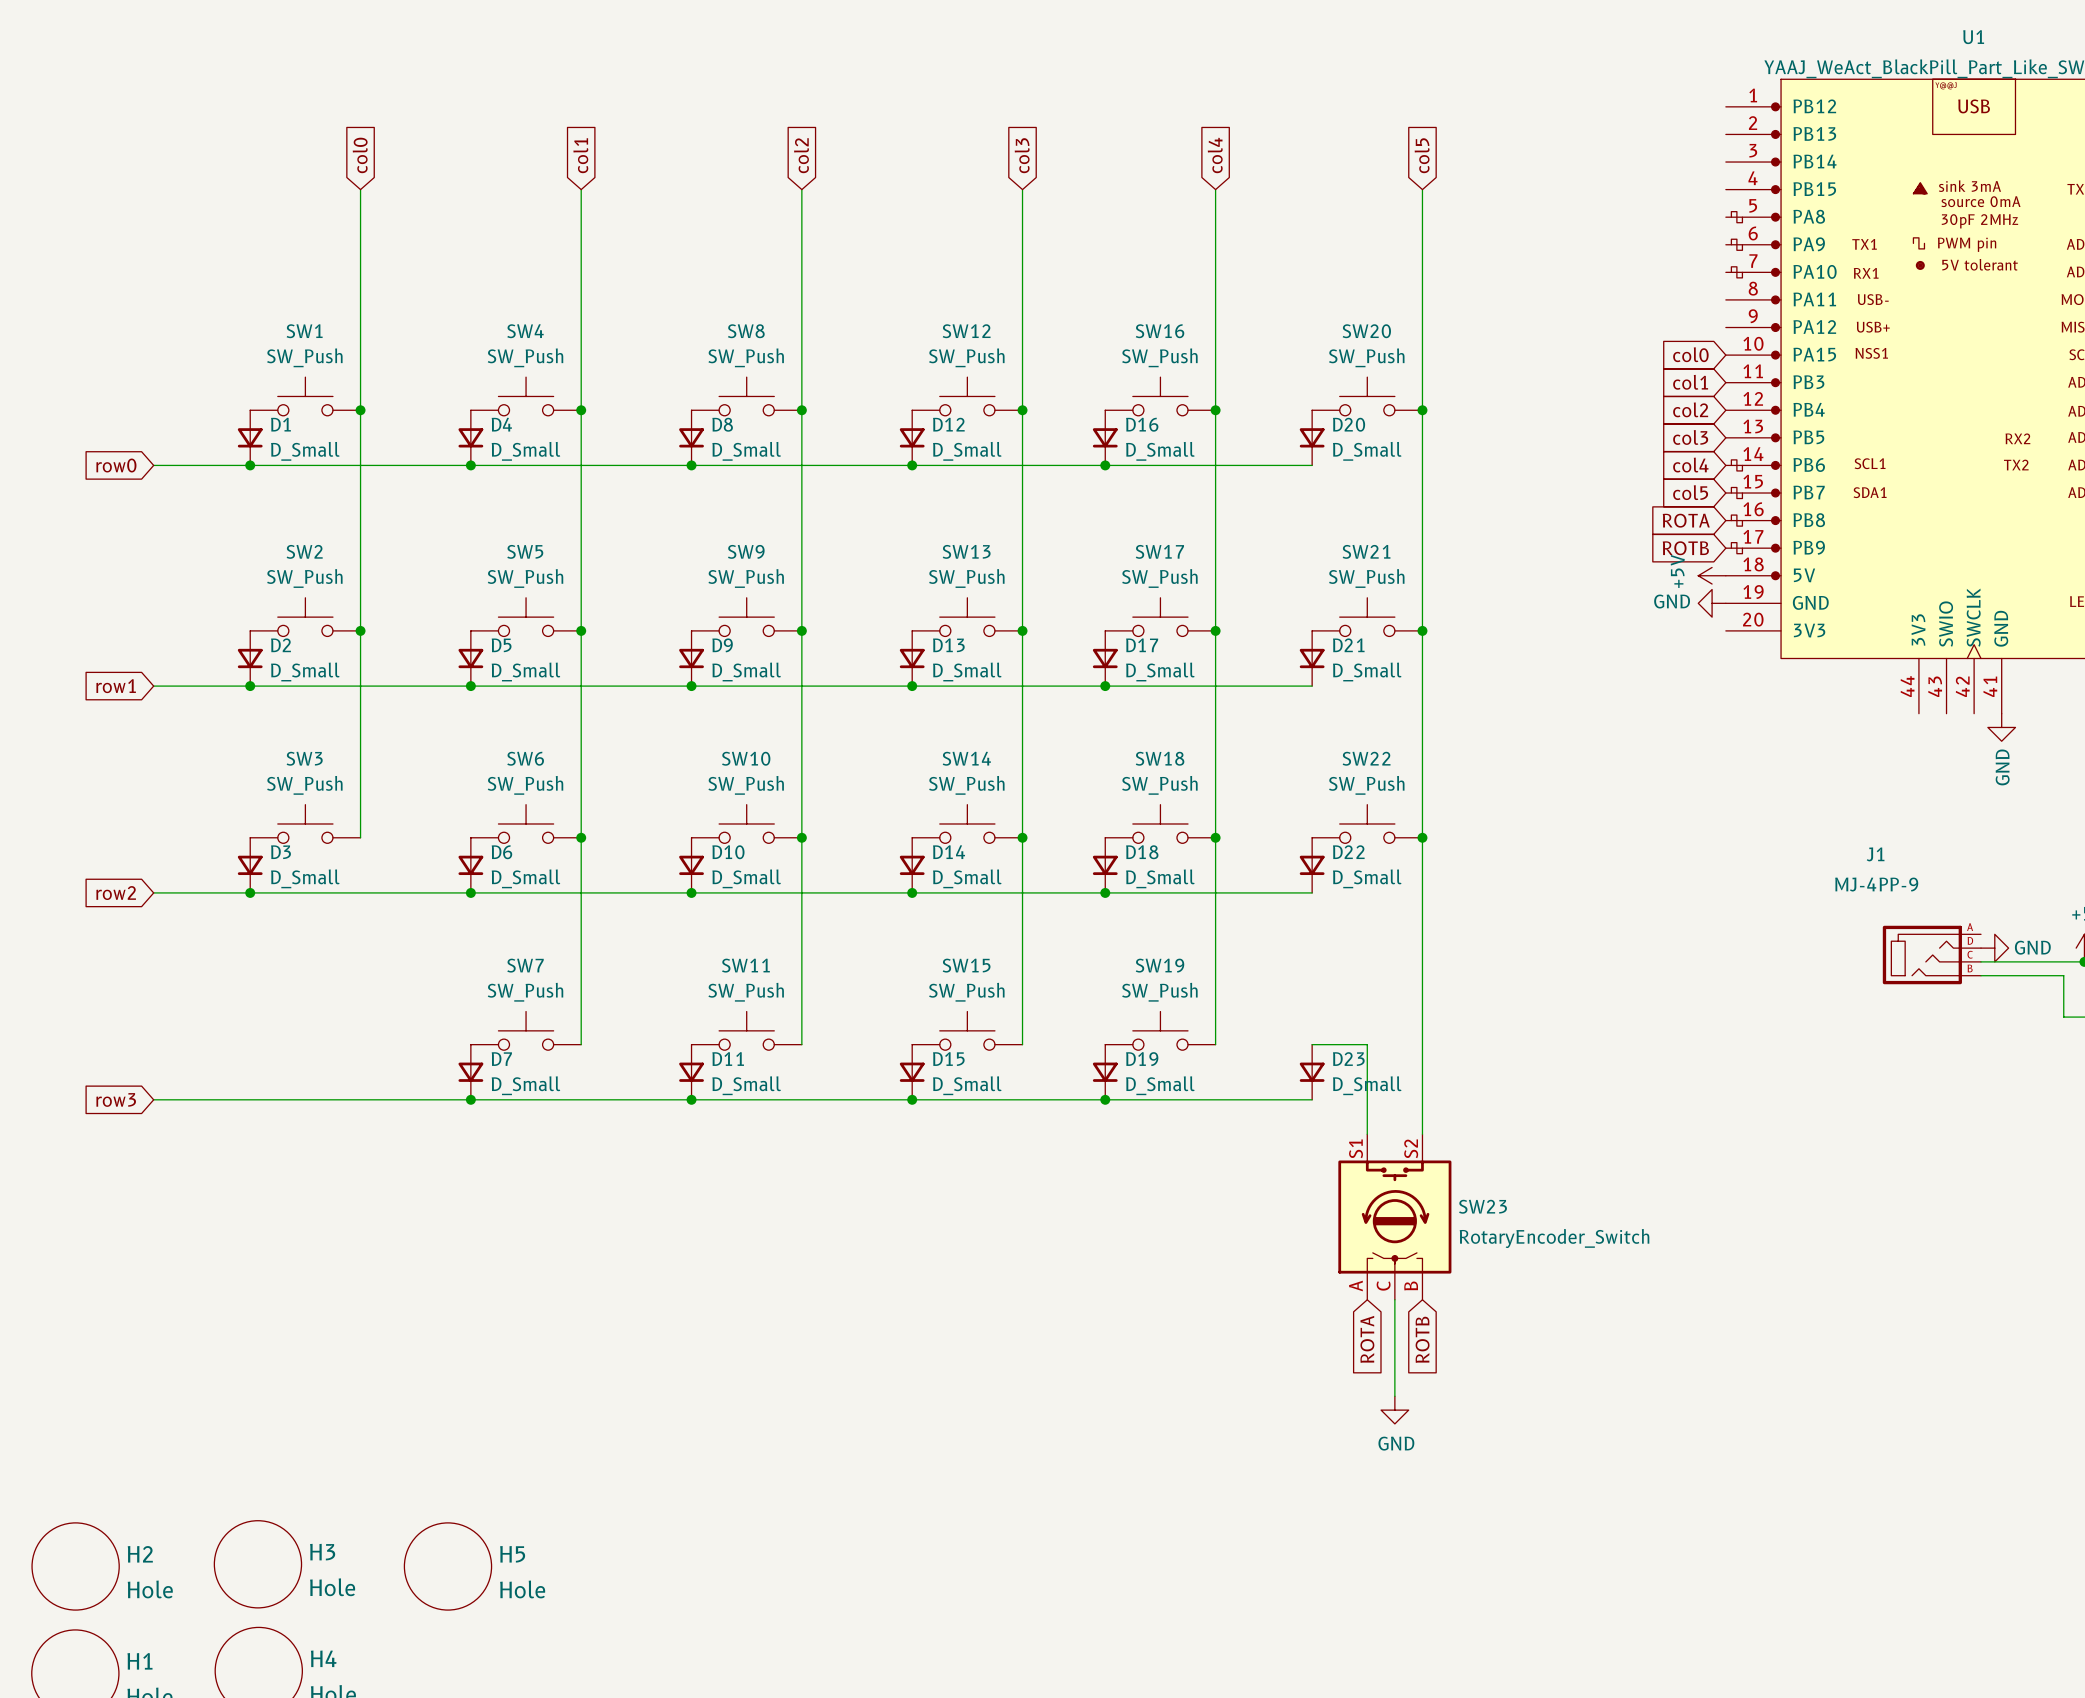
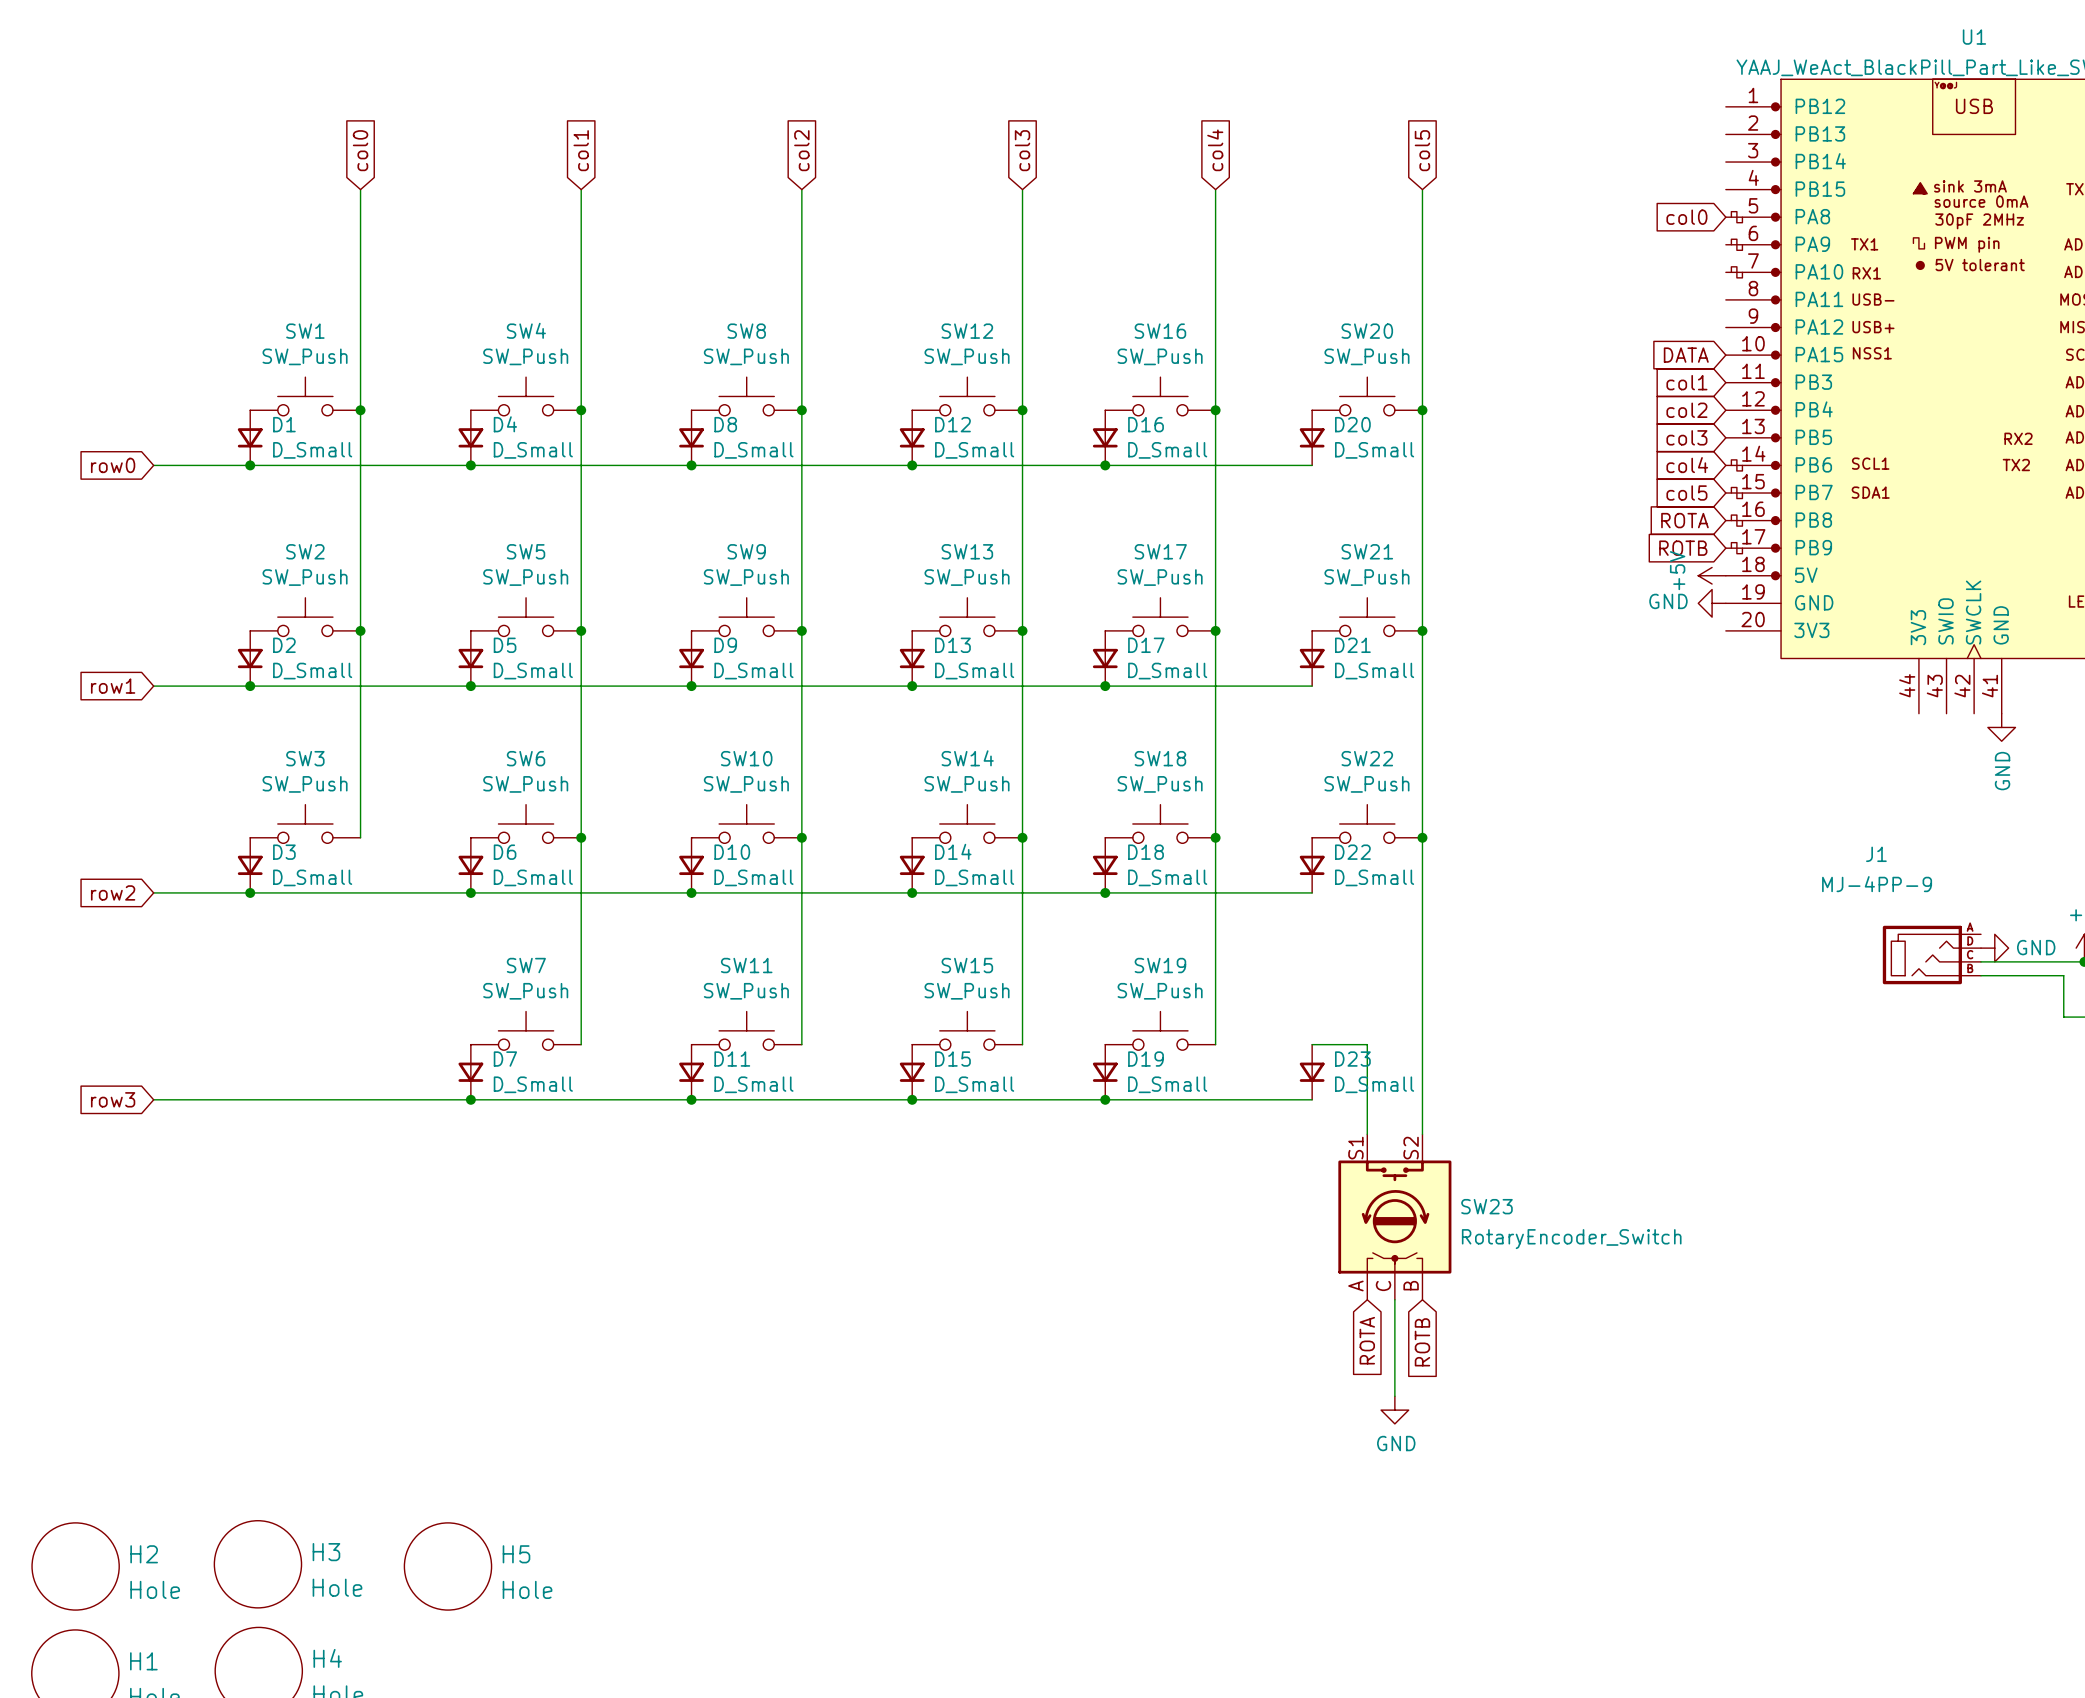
global label: none -> col0 (1686, 217)
global label: col0 (1690, 354) -> DATA (1686, 355)

